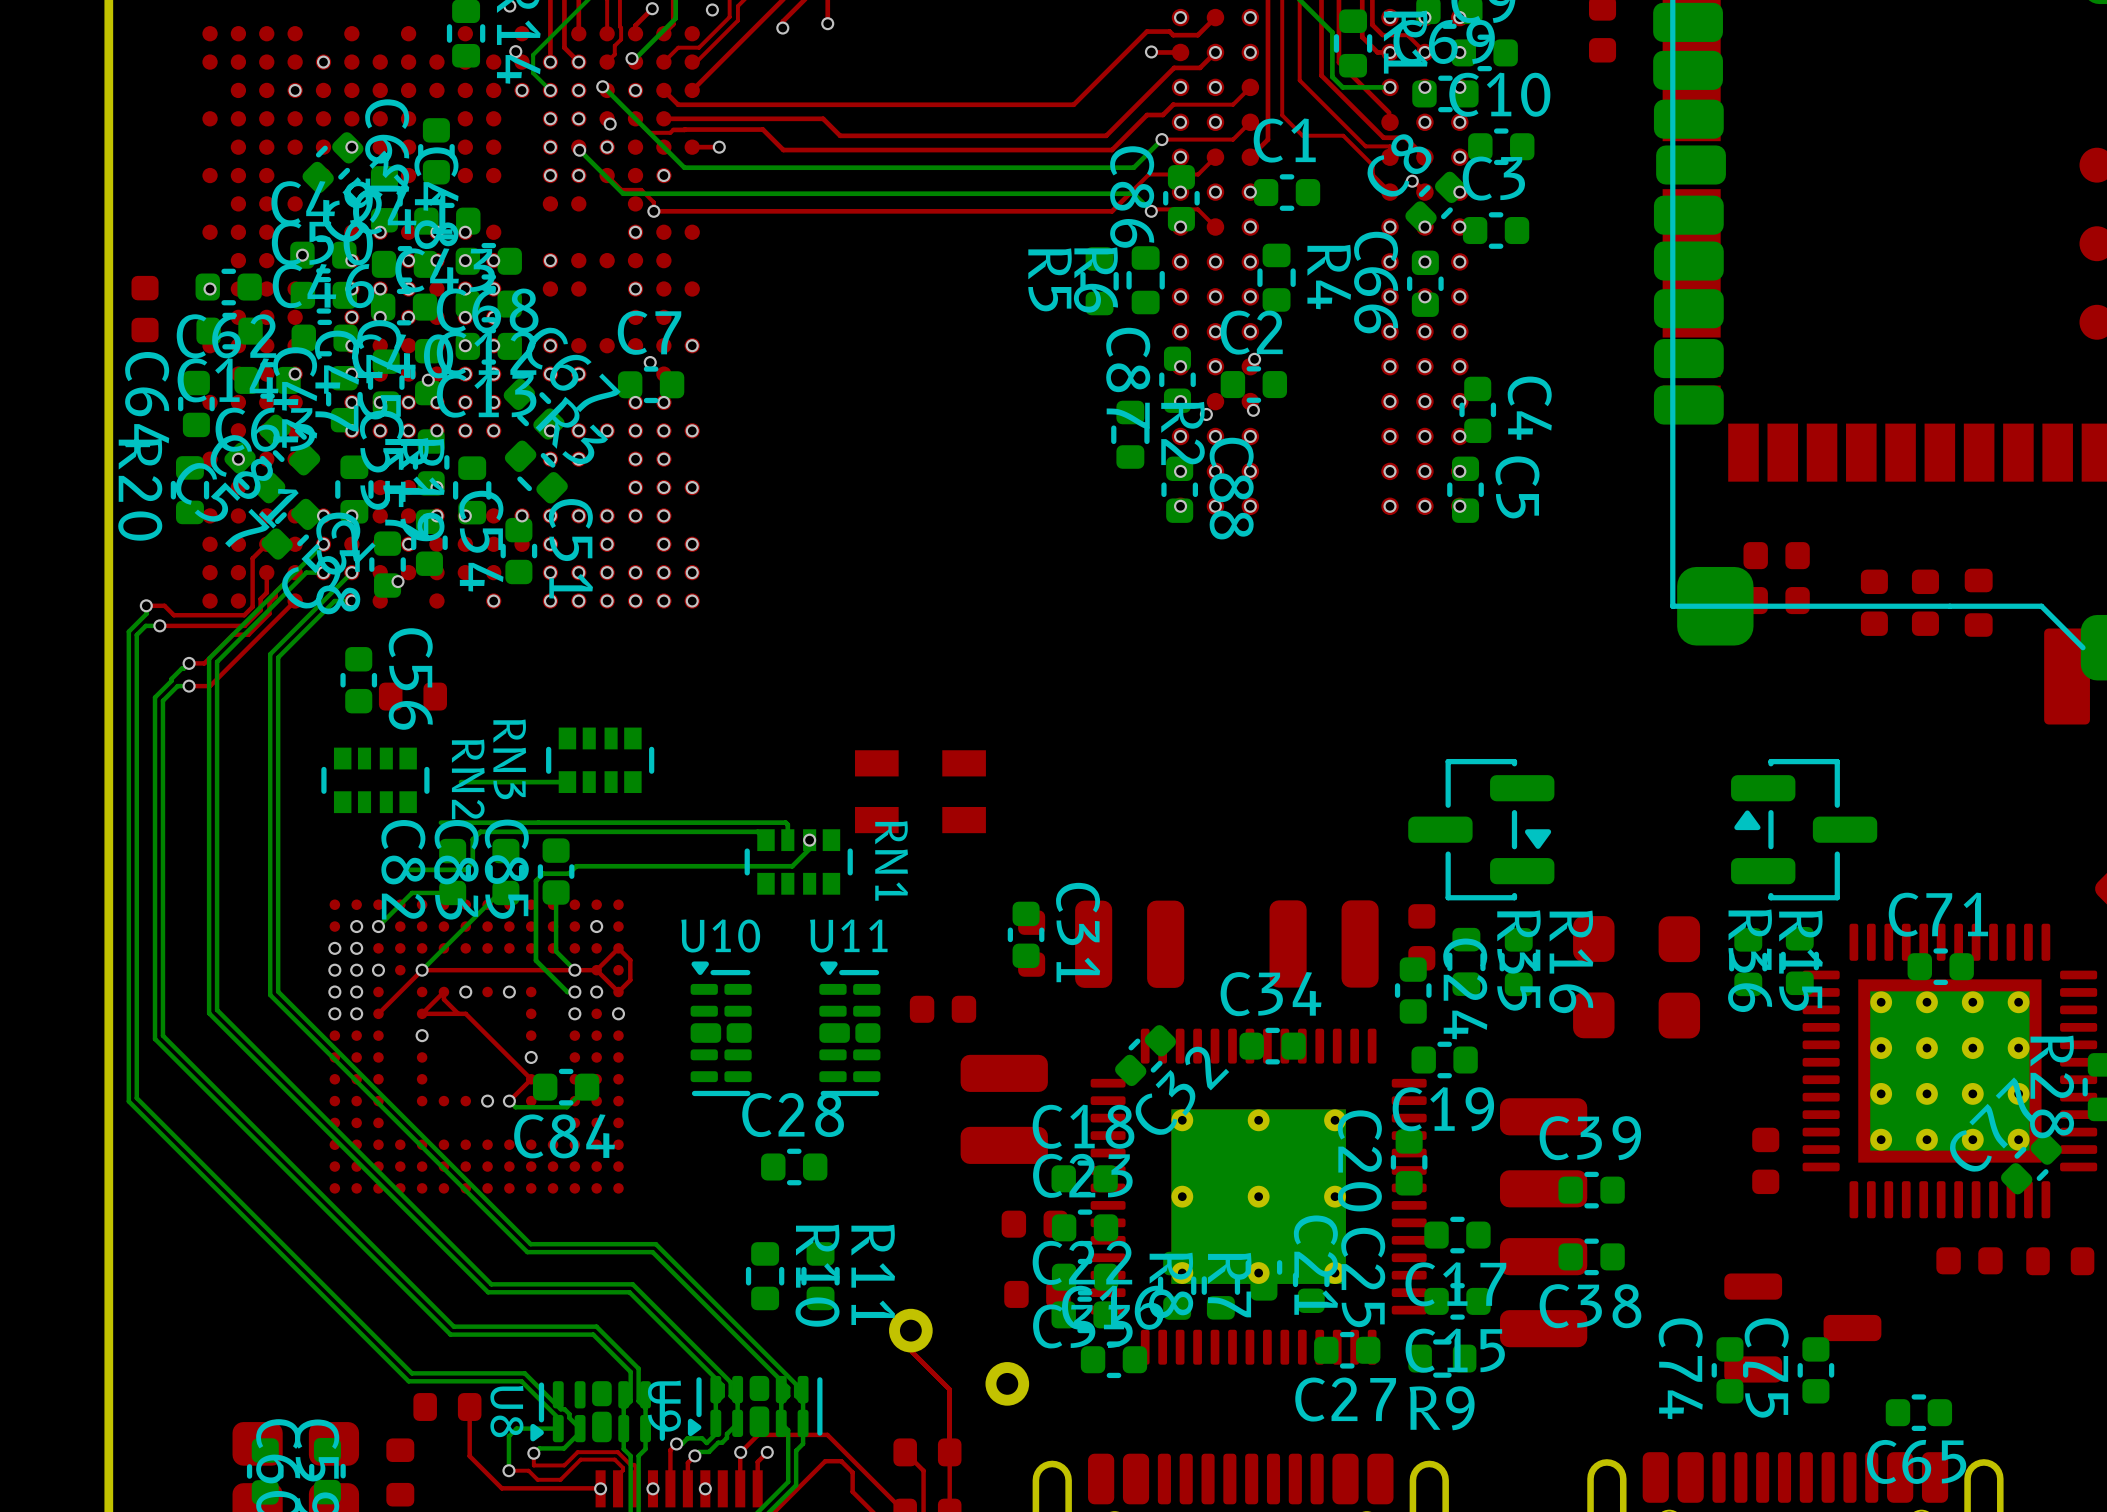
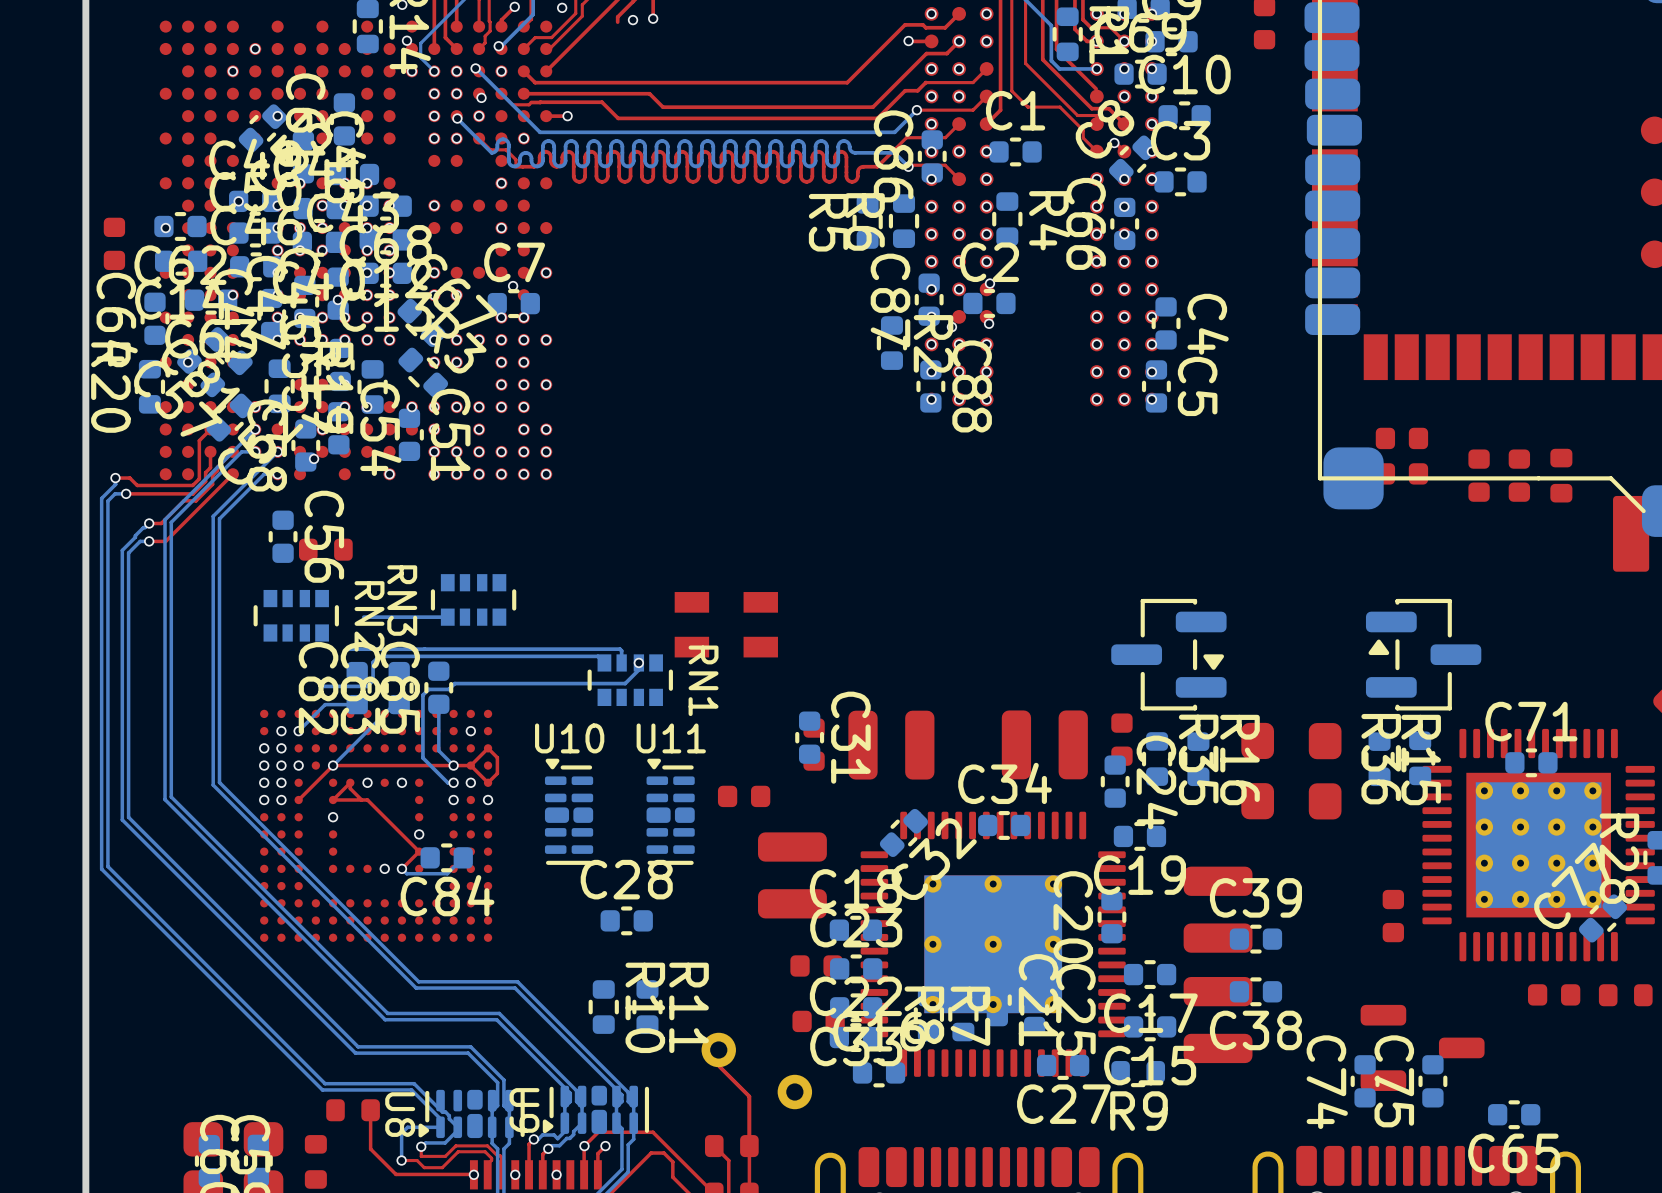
via position: (782, 28) -> (633, 20)
via: (550, 62) -> none
via: (578, 62) -> none
bottom track: none -> (849, 147) (851, 151) (855, 152)
bottom track: (1083, 193) (623, 193) -> (849, 146) (845, 141) (839, 143) (837, 162) (832, 166) (827, 163) (826, 145) (821, 141) (816, 144) (815, 162) (809, 166) (804, 162) (803, 144) (798, 141) (792, 145) (792, 163) (787, 166) (782, 163) (781, 145) (775, 141) (770, 144) (769, 162) (764, 166) (759, 163) (758, 145) (753, 141) (747, 144) (747, 162) (741, 166) (736, 162) (735, 144) (730, 141) (724, 145) (724, 163) (718, 166) (713, 163) (713, 145) (708, 141) (702, 144) (701, 162) (696, 166) (691, 163) (690, 145) (685, 141) (679, 144) (679, 162) (674, 166) (668, 163) (667, 145) (662, 141) (657, 144) (656, 162) (651, 166) (645, 163) (644, 145) (640, 141) (634, 144) (633, 162) (628, 166) (622, 163) (622, 145) (617, 141) (611, 144) (610, 162) (605, 166) (600, 163) (599, 145) (594, 141) (588, 144) (588, 162) (583, 166) (577, 163) (576, 145) (571, 141) (566, 144) (565, 162) (560, 166) (554, 163) (554, 145) (549, 141) (543, 144) (542, 162) (538, 166) (533, 164) (530, 155) (525, 152) (520, 155) (517, 165) (510, 165) (508, 161) (508, 143) (504, 139) (499, 140) (496, 150) (491, 152)
via: (653, 211) -> none
top track: (1094, 211) (676, 211) -> (863, 166) (859, 168) (857, 178) (852, 181) (846, 177) (846, 155) (840, 151) (835, 156) (834, 178) (829, 181) (823, 177) (823, 155) (818, 151) (812, 156) (812, 178) (806, 181) (801, 178) (800, 156) (795, 151) (789, 155) (789, 177) (784, 181) (778, 178) (778, 156) (773, 151) (767, 155) (766, 177) (761, 181) (755, 178) (755, 156) (750, 151) (744, 155) (744, 177) (739, 181) (733, 178) (732, 156) (727, 151) (721, 155) (721, 177) (716, 181) (710, 178) (709, 156) (705, 151) (699, 155) (698, 177) (693, 181) (687, 178) (687, 156) (682, 151) (676, 155) (675, 177) (670, 181) (664, 178) (664, 156) (659, 151) (653, 155) (653, 177) (648, 181) (642, 178) (641, 156) (636, 151) (630, 155) (630, 177) (625, 181) (619, 178) (619, 156) (614, 151) (608, 155) (607, 177) (603, 181) (596, 178) (596, 156) (592, 151) (585, 155) (584, 177) (580, 181) (574, 178) (573, 156) (569, 152) (564, 153) (561, 163) (556, 166) (551, 163) (549, 153) (543, 152) (539, 155) (538, 164) (533, 166)

